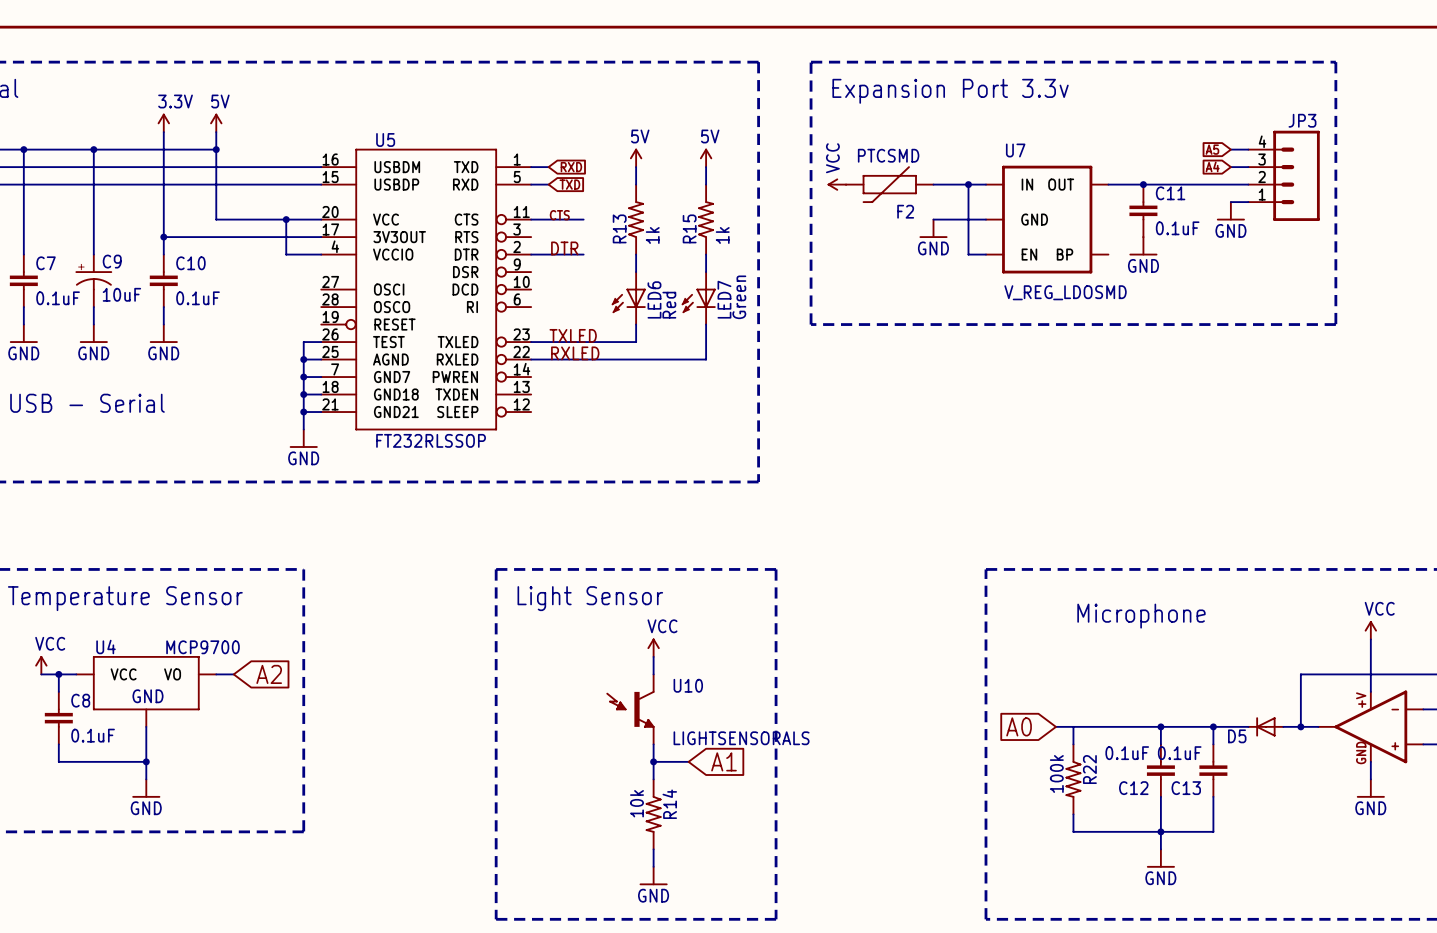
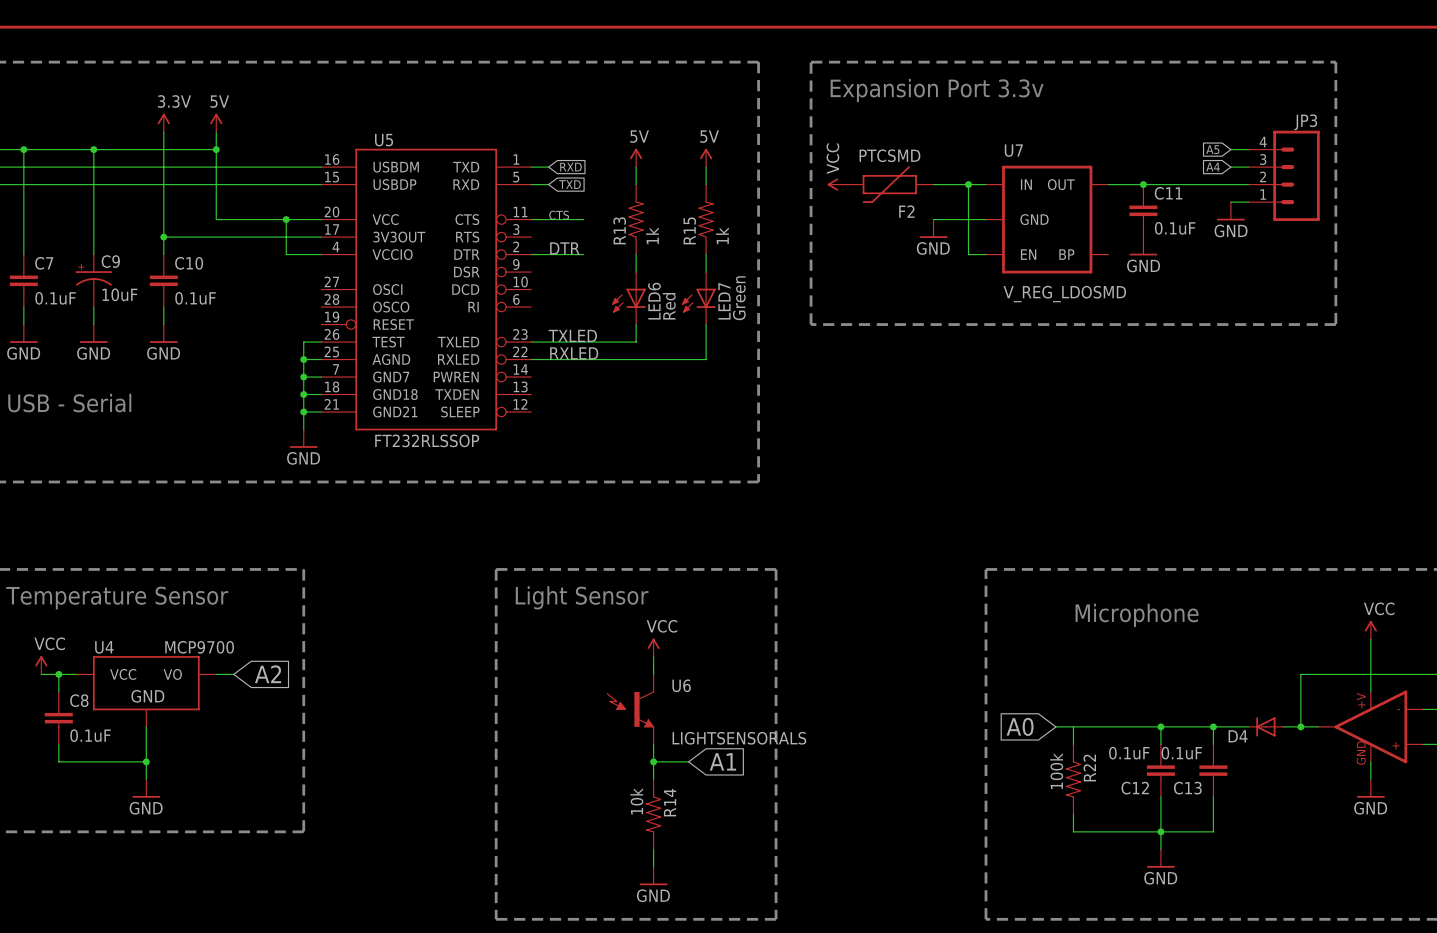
U10 name: U10 (688, 685) -> U6 (681, 685)
D5 name: D5 (1237, 736) -> D4 (1238, 736)

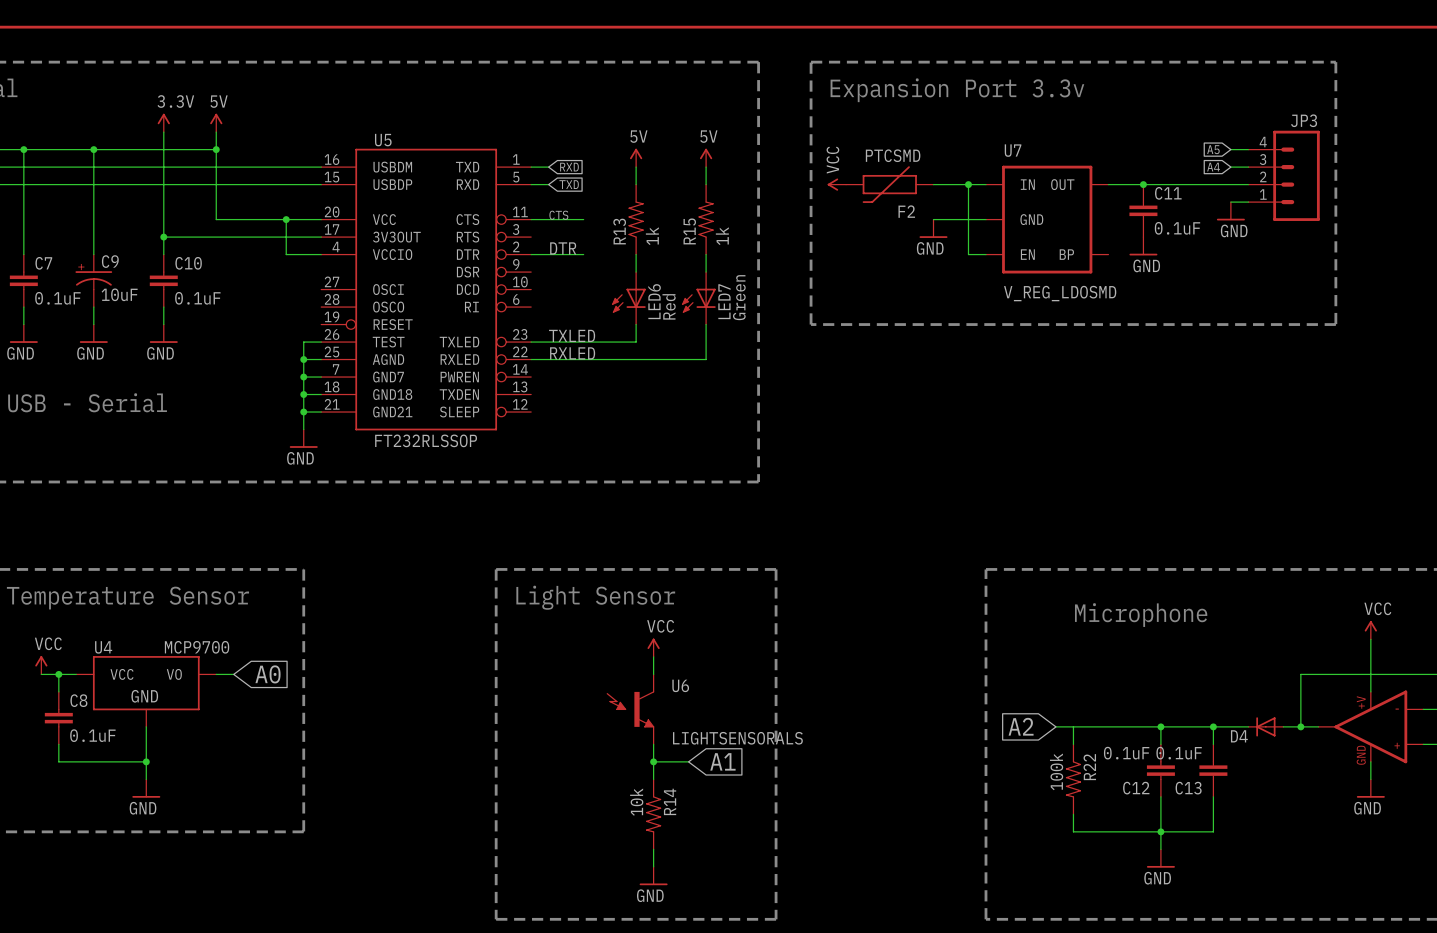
global label: A2 (268, 674) -> A0 (268, 674)
global label: A0 (1020, 726) -> A2 (1021, 726)

